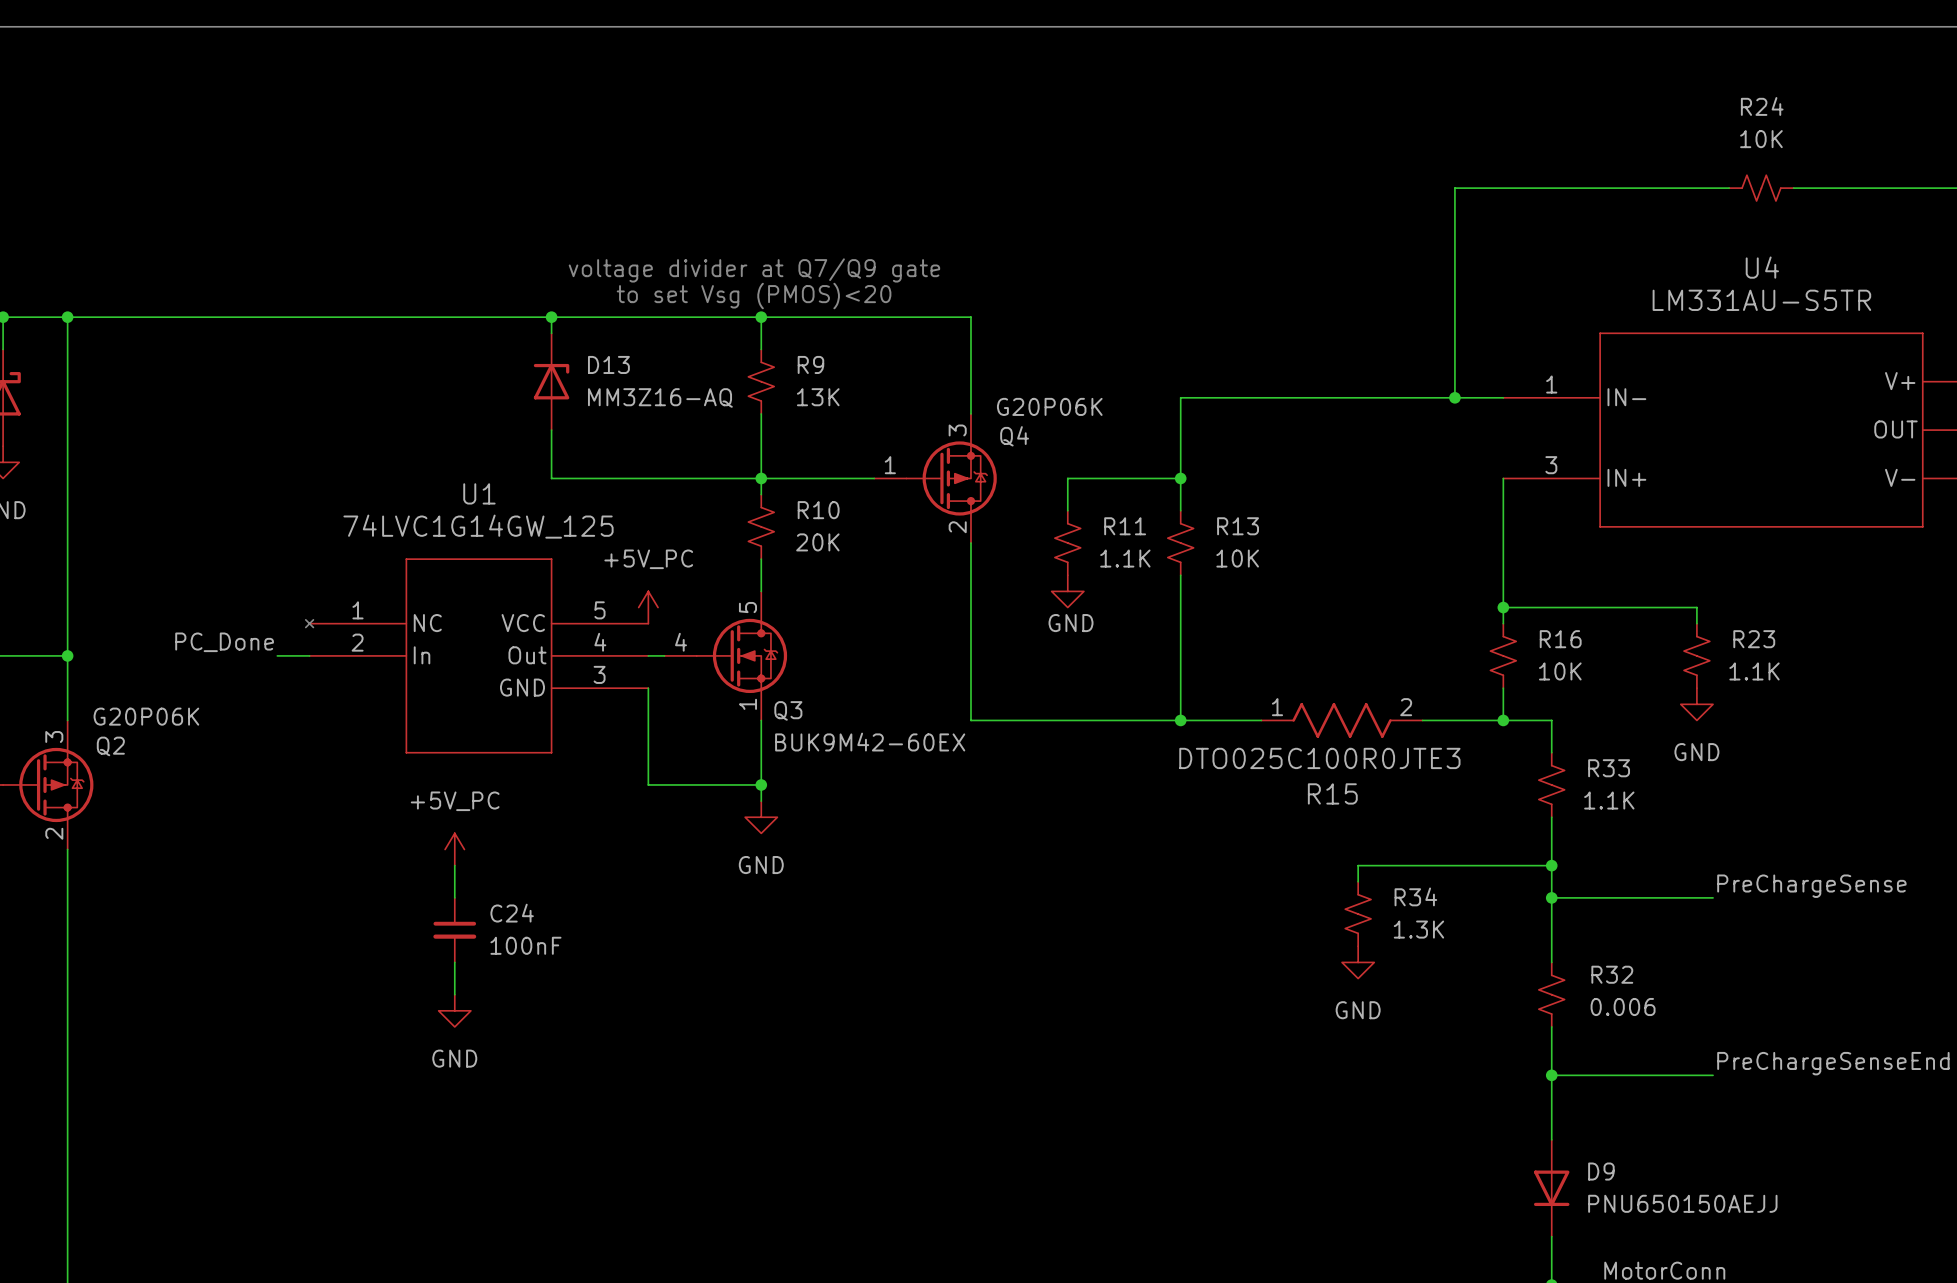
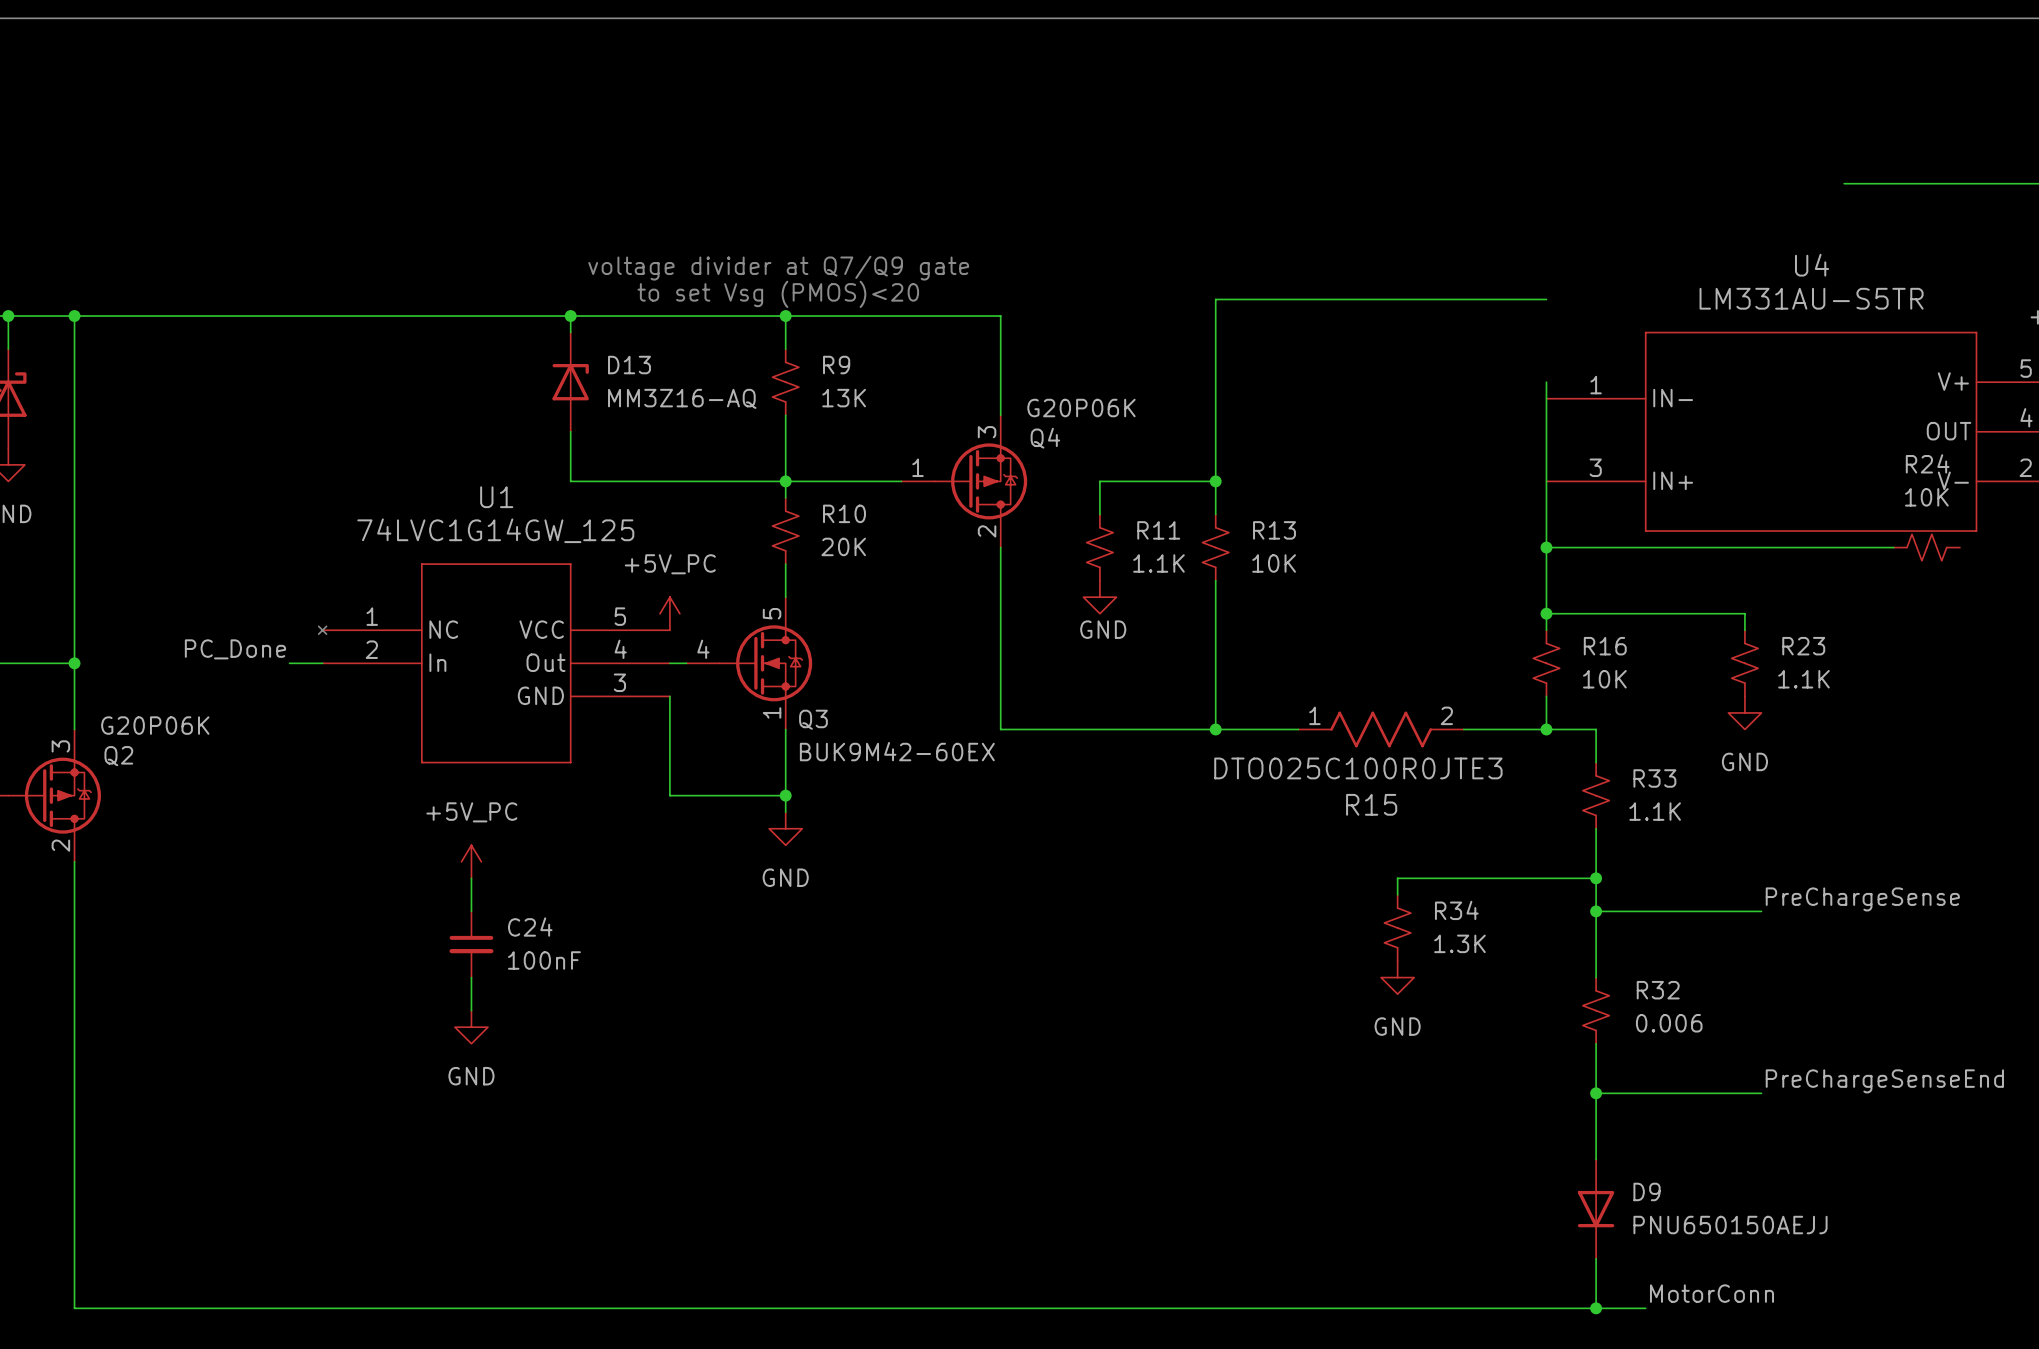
wire: (1729, 188) (1454, 188) (1454, 397) -> none
R24 position: (1761, 188) -> (1926, 547)
wire: none -> (1546, 382) (1546, 481)
wire: (1180, 397) (1503, 397) -> (1215, 398) (1215, 299) (1546, 299)
junction: (1454, 397) -> none
wire: none -> (1546, 547) (1893, 547)
junction: none -> (1546, 547)

